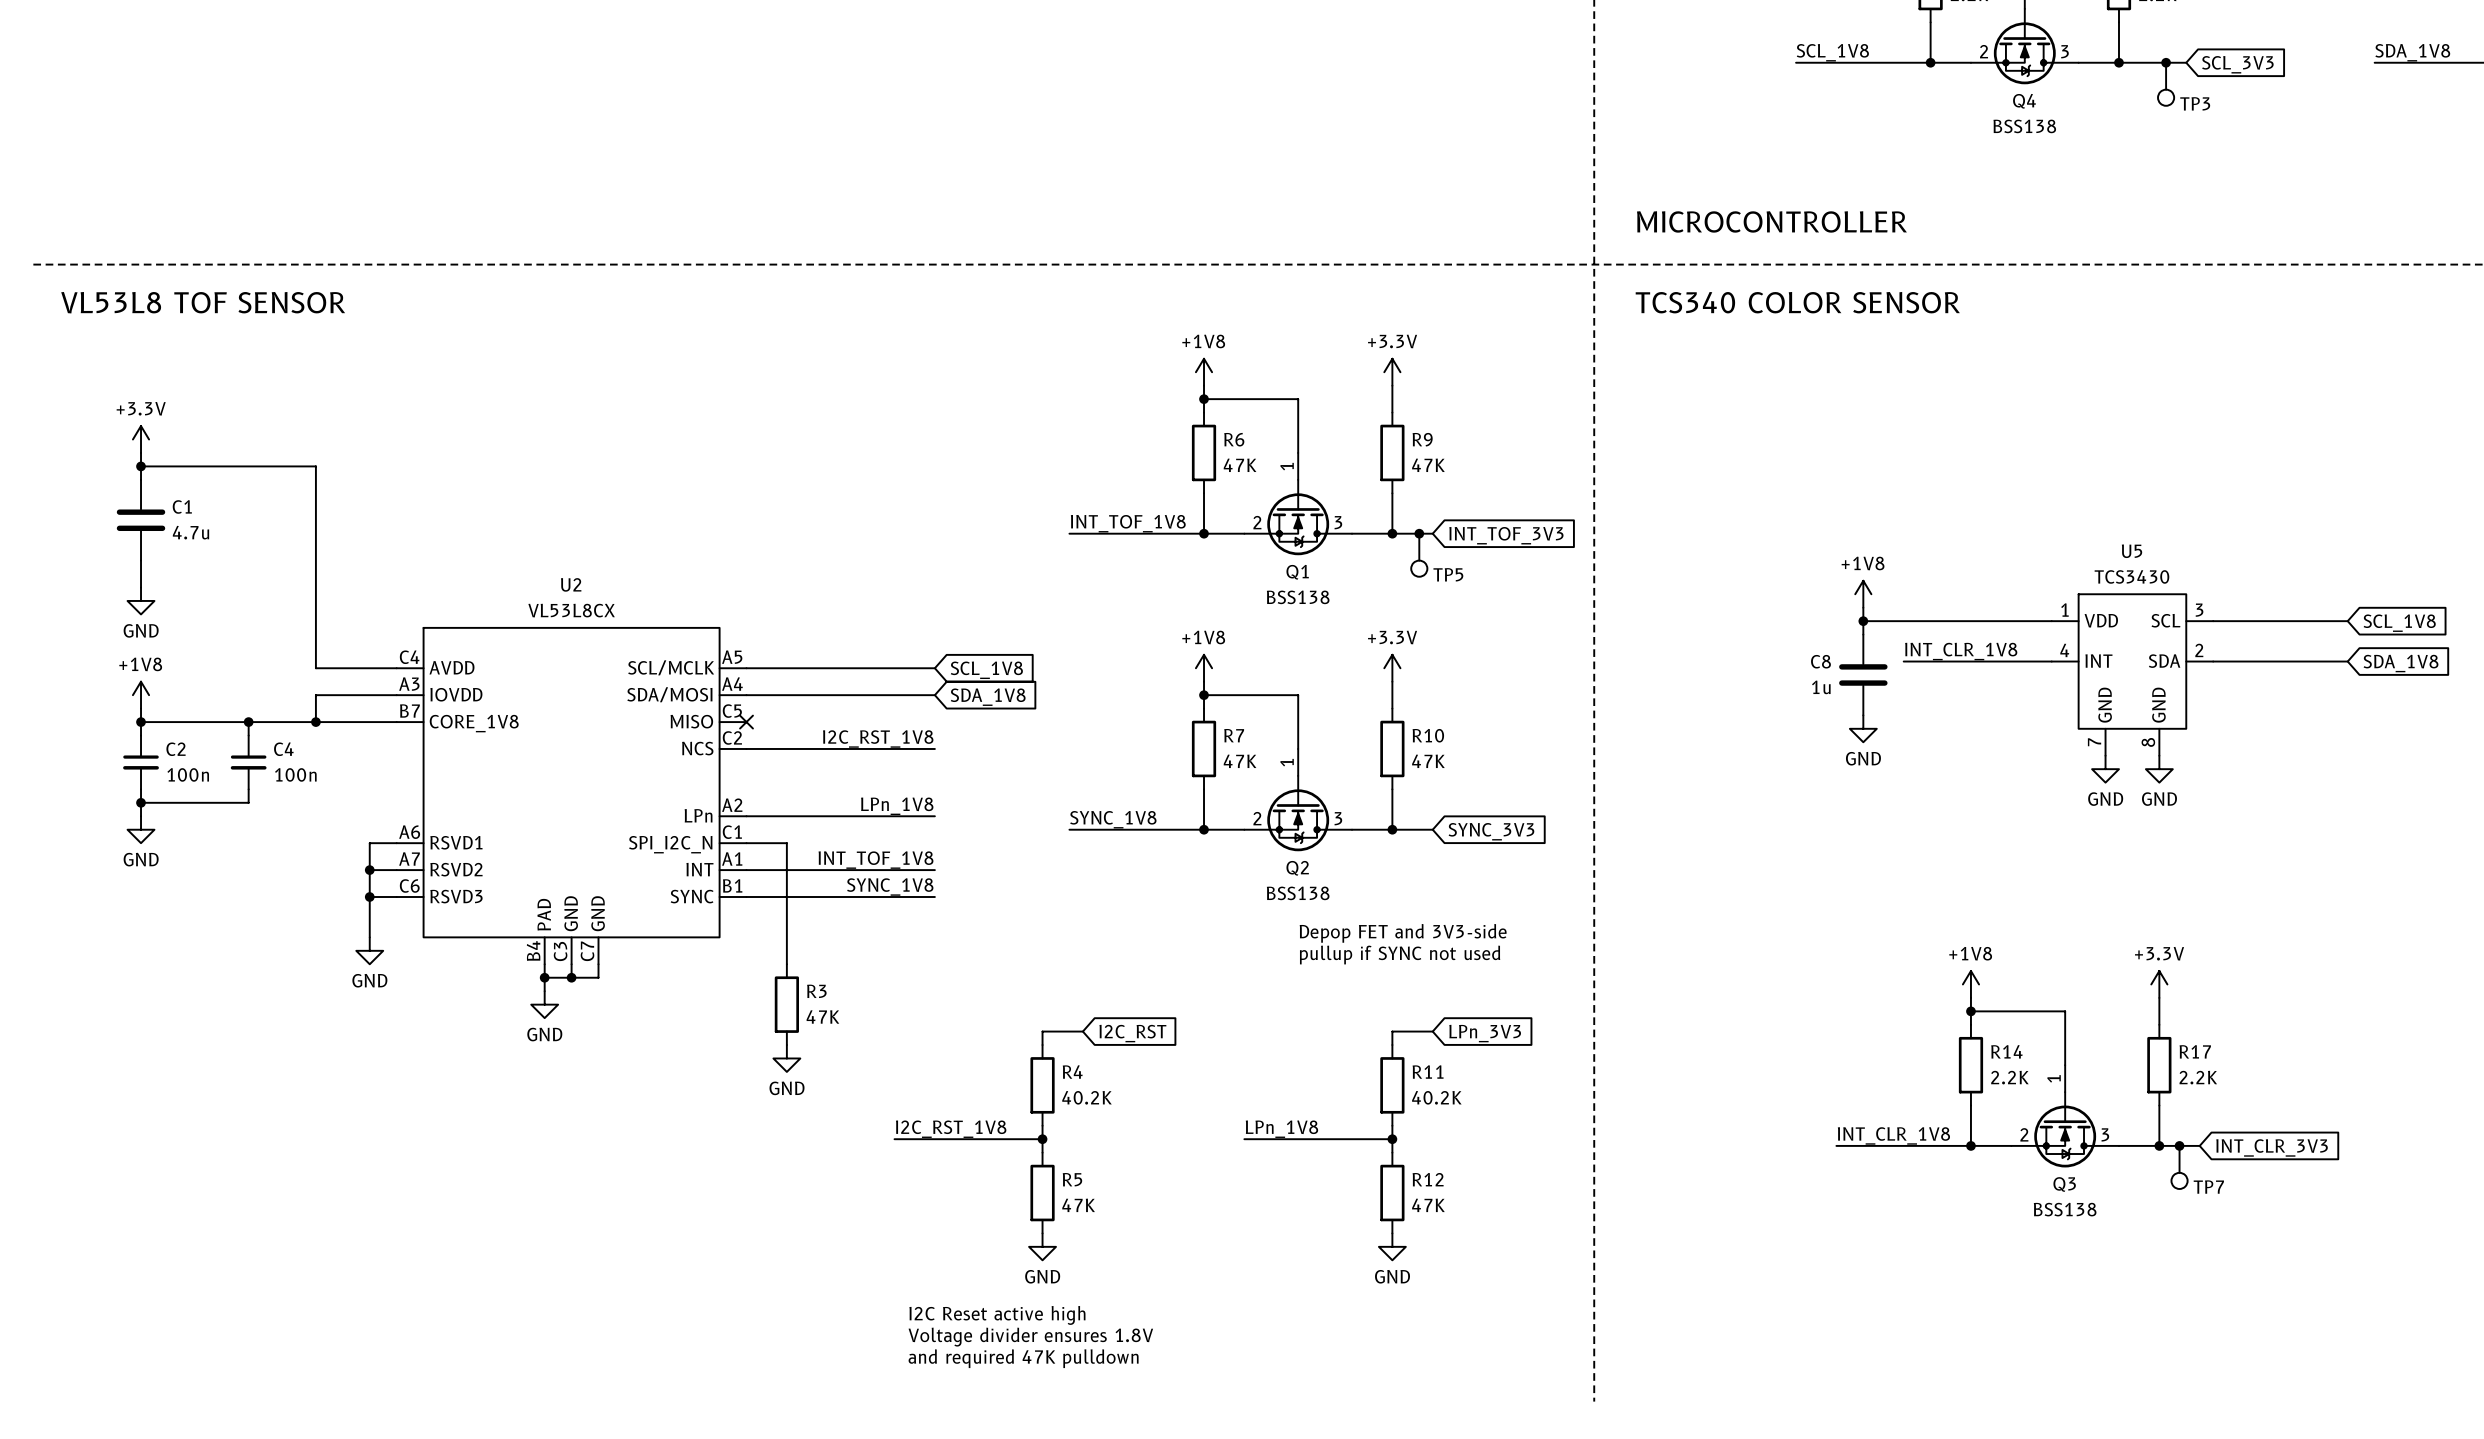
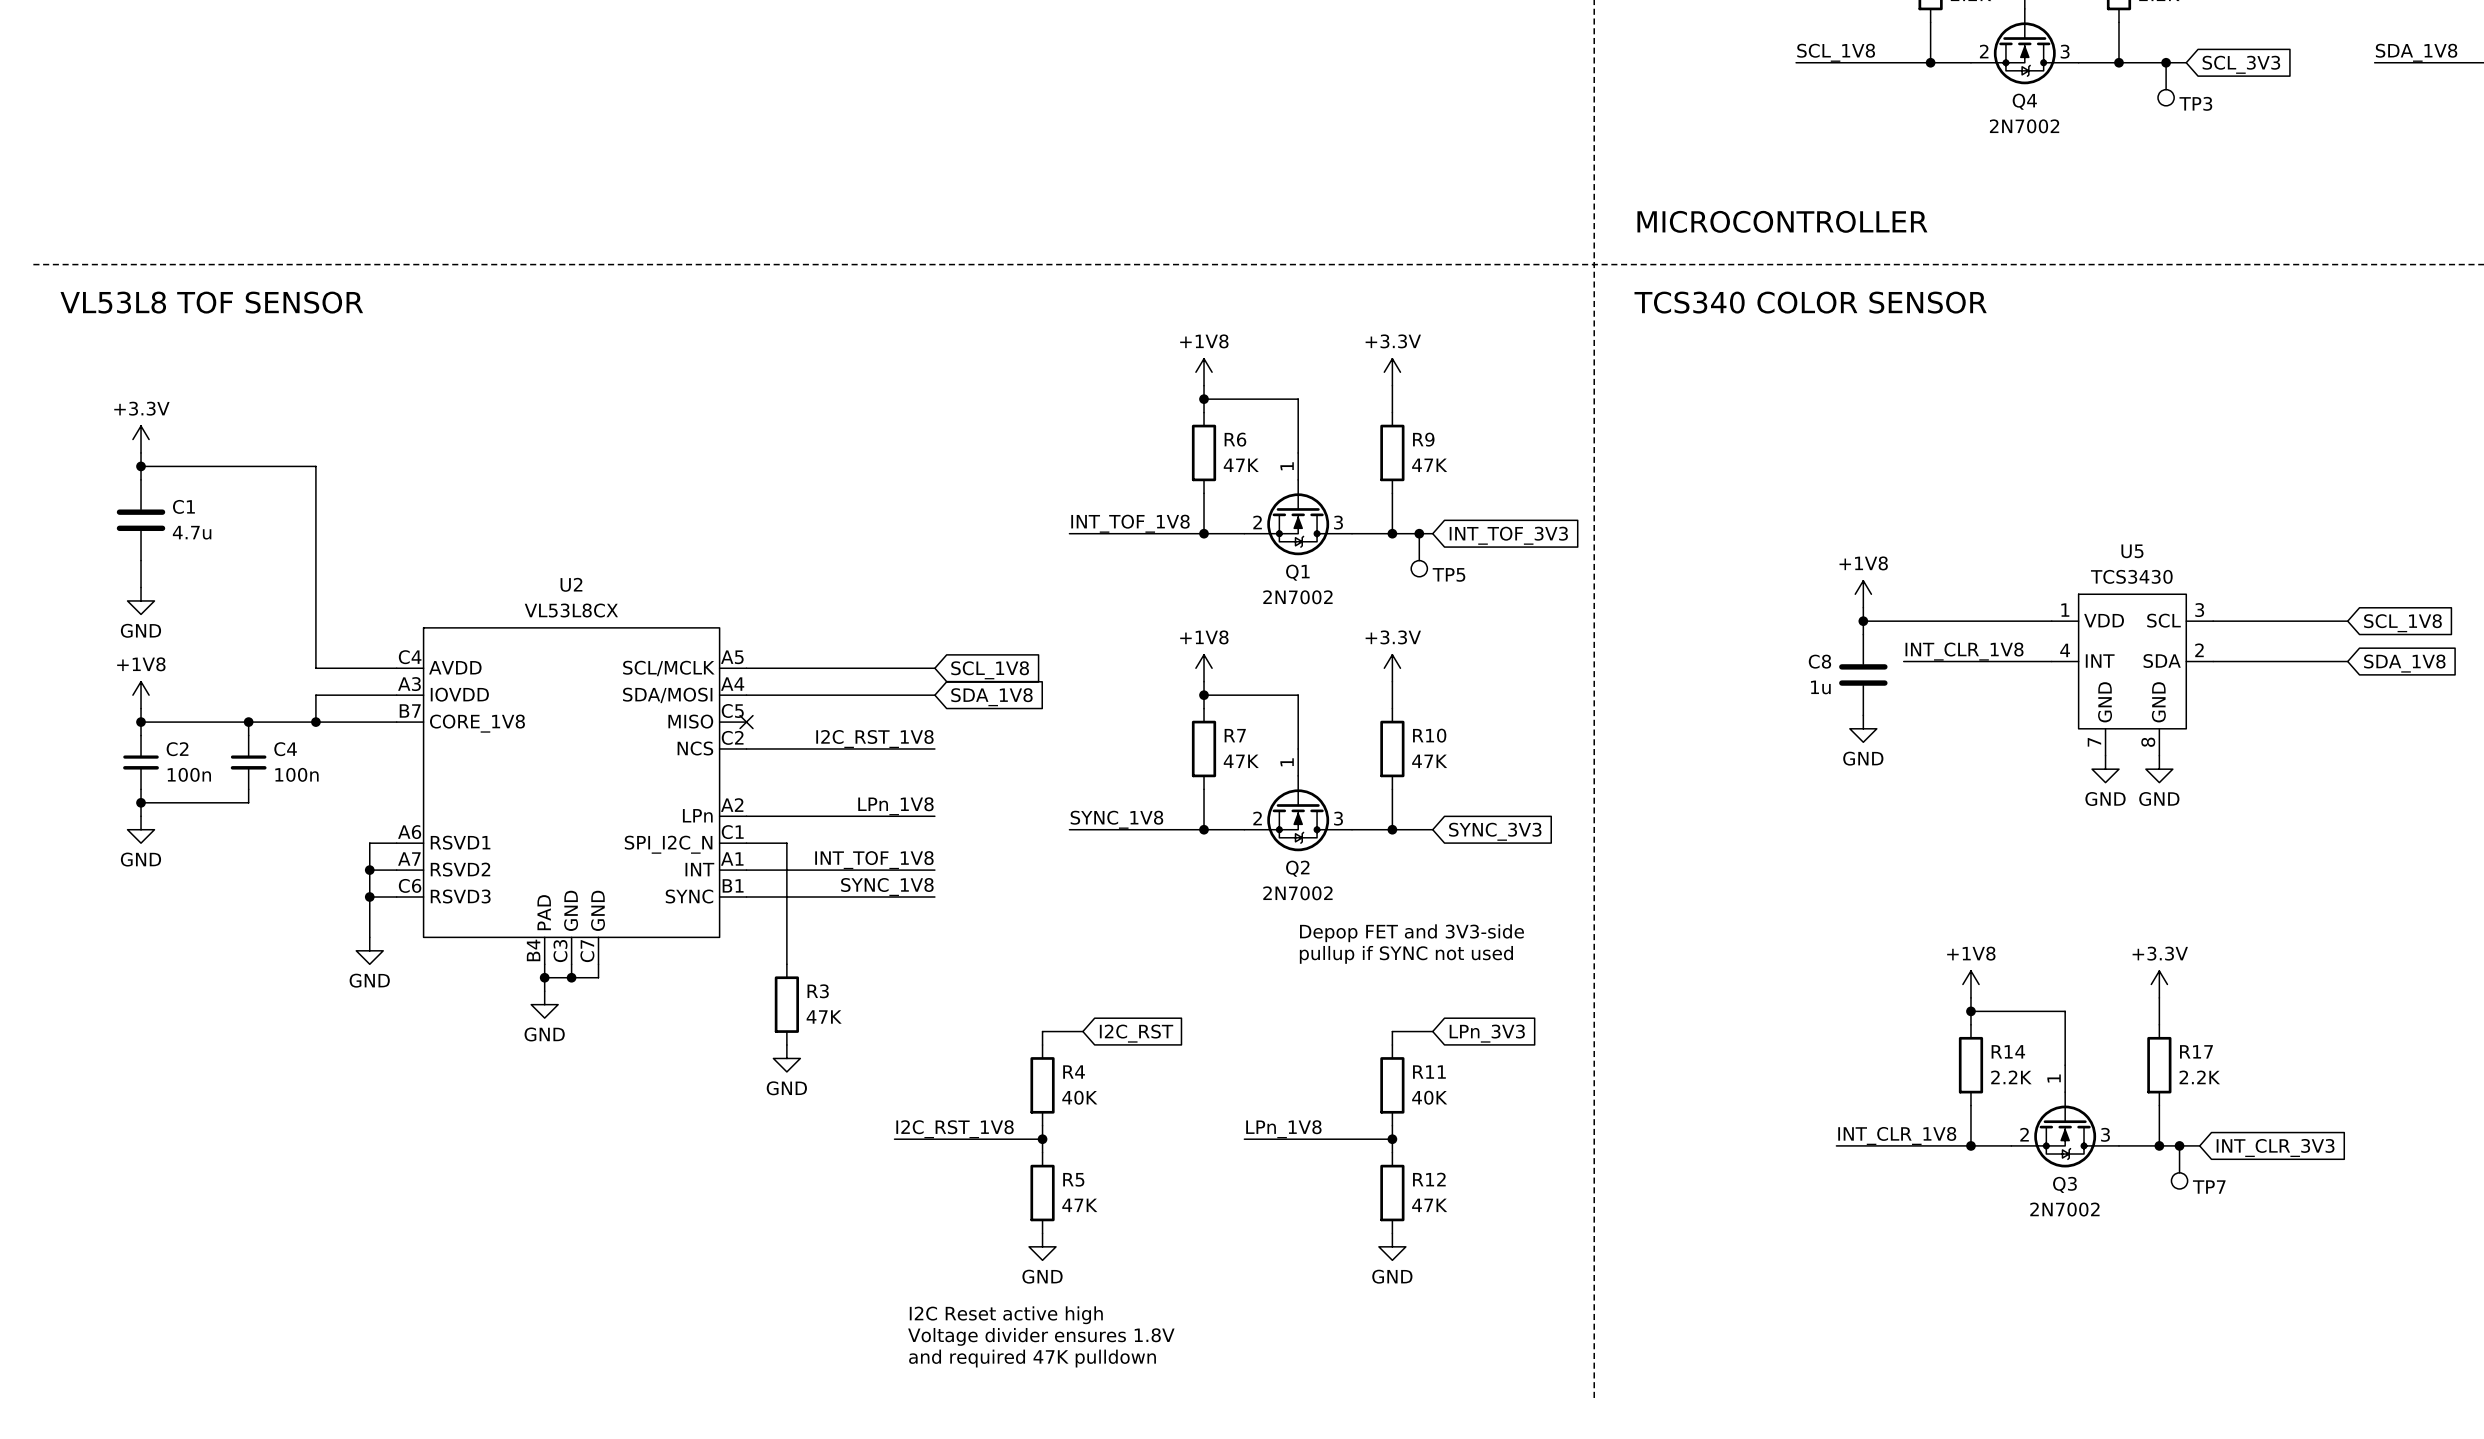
Q4 value: BSS138 (2024, 126) -> 2N7002 (2024, 126)
Q1 value: BSS138 (1298, 597) -> 2N7002 (1297, 597)
Q2 value: BSS138 (1298, 893) -> 2N7002 (1297, 893)
R4 value: 40.2K (1087, 1097) -> 40K (1079, 1097)
R11 value: 40.2K (1436, 1097) -> 40K (1429, 1097)
Q3 value: BSS138 (2065, 1209) -> 2N7002 (2064, 1209)

